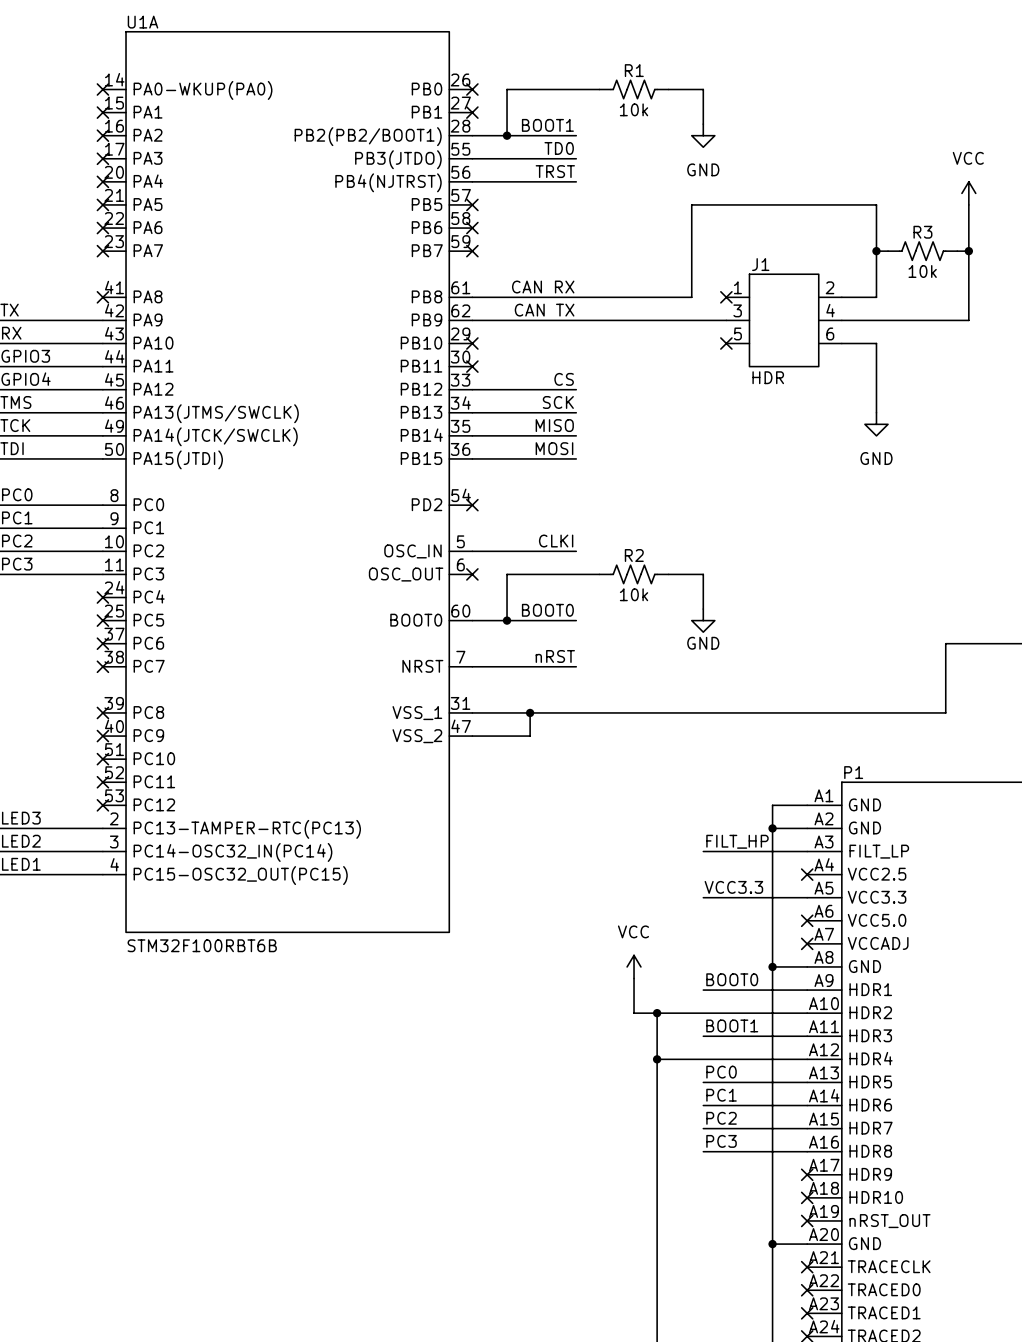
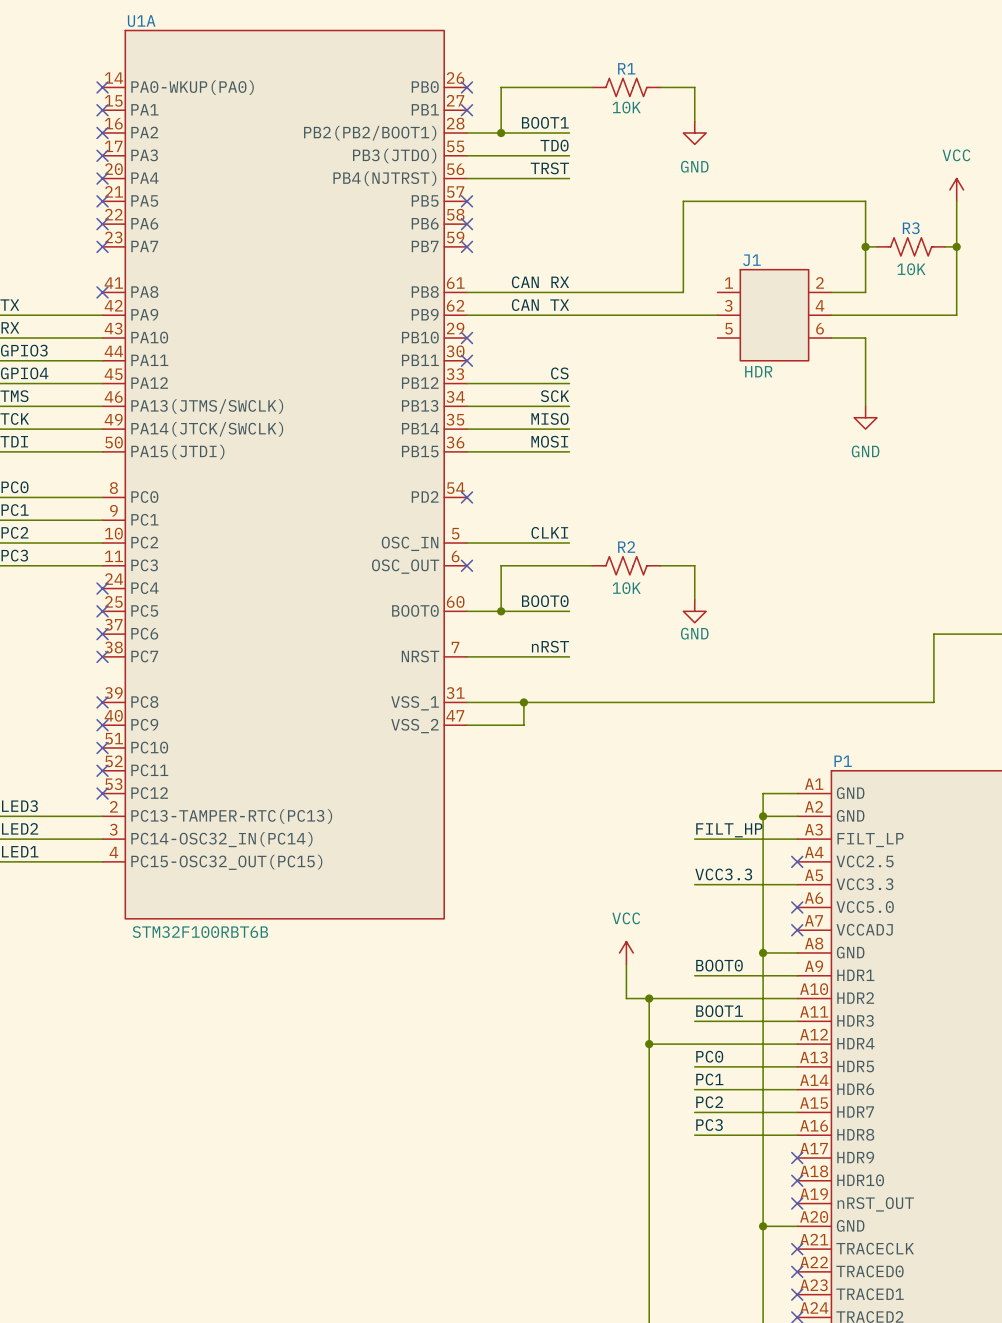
R1 text: 10k (634, 109) -> 10K (626, 107)
R3 text: 10k (922, 271) -> 10K (911, 269)
no-connect mark: (726, 297) -> none
no-connect mark: (726, 343) -> none
R2 text: 10k (634, 594) -> 10K (626, 588)

